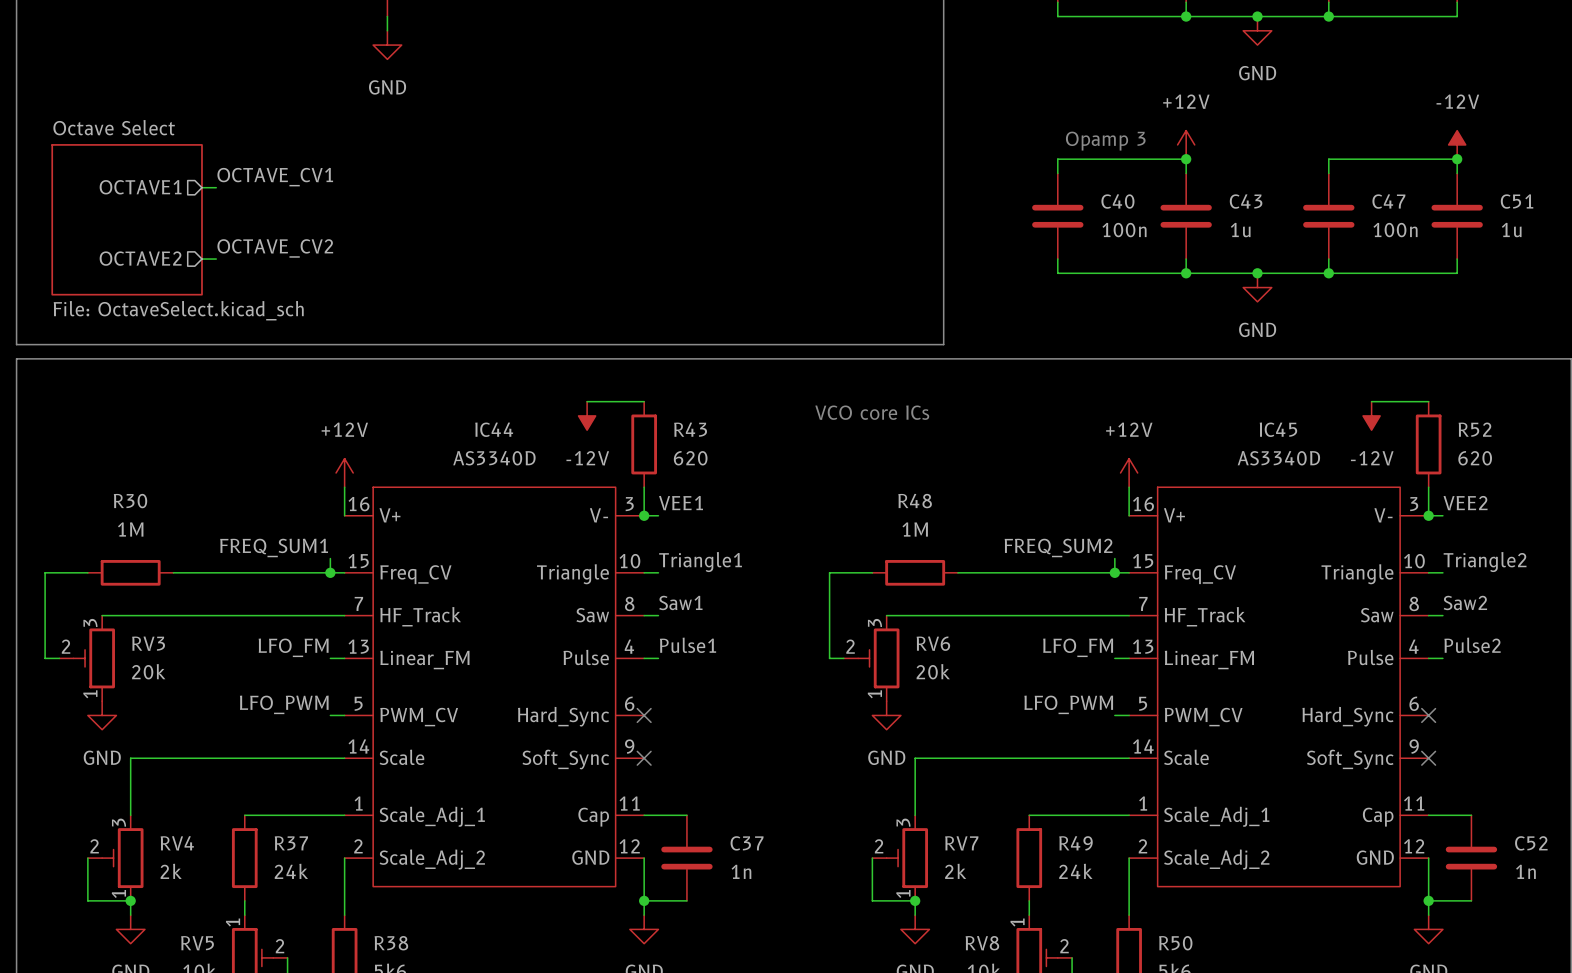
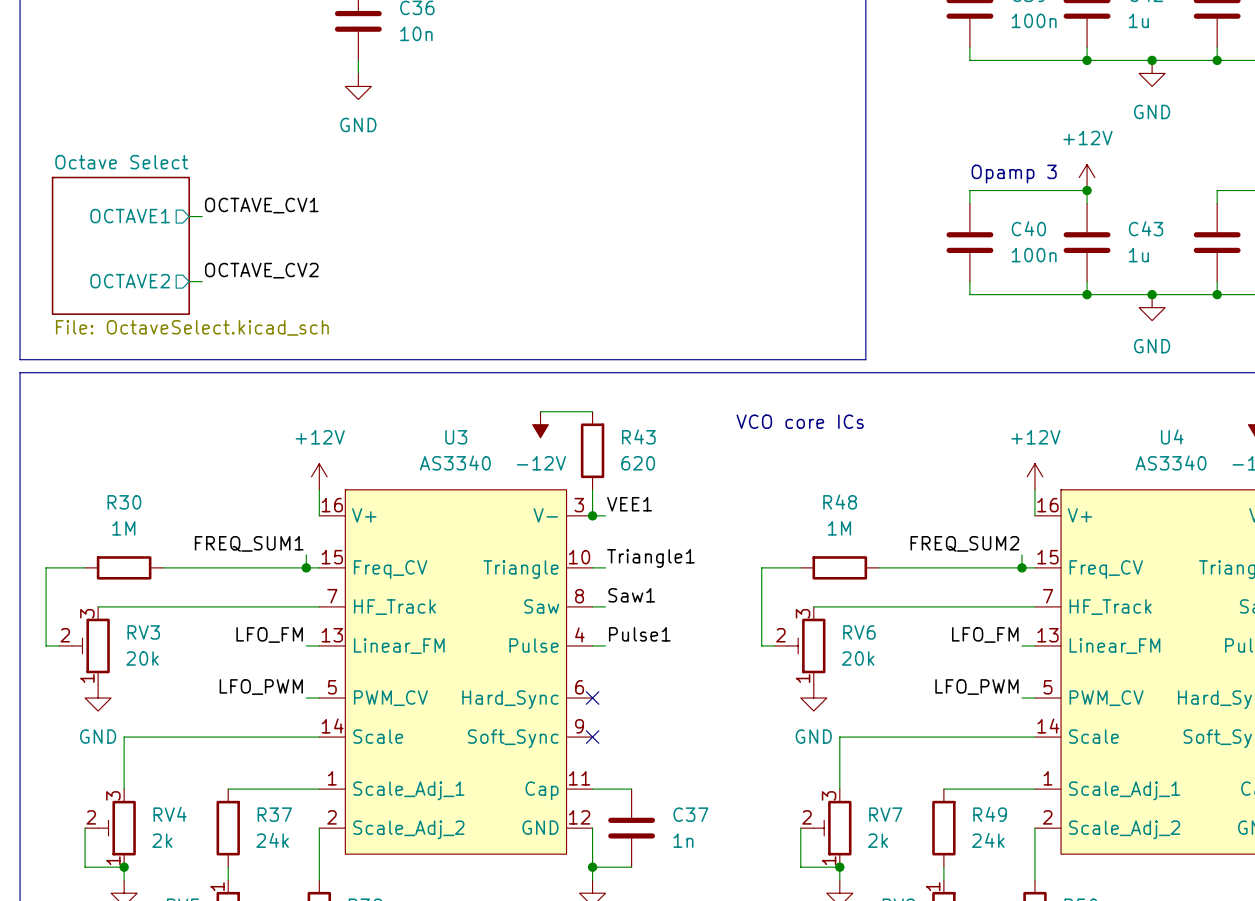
IC44 name: IC44 (494, 429) -> U3 (456, 437)
IC45 name: IC45 (1278, 429) -> U4 (1172, 436)
IC44 value: AS3340D (494, 458) -> AS3340 (455, 463)
IC45 value: AS3340D (1278, 458) -> AS3340 (1171, 463)

